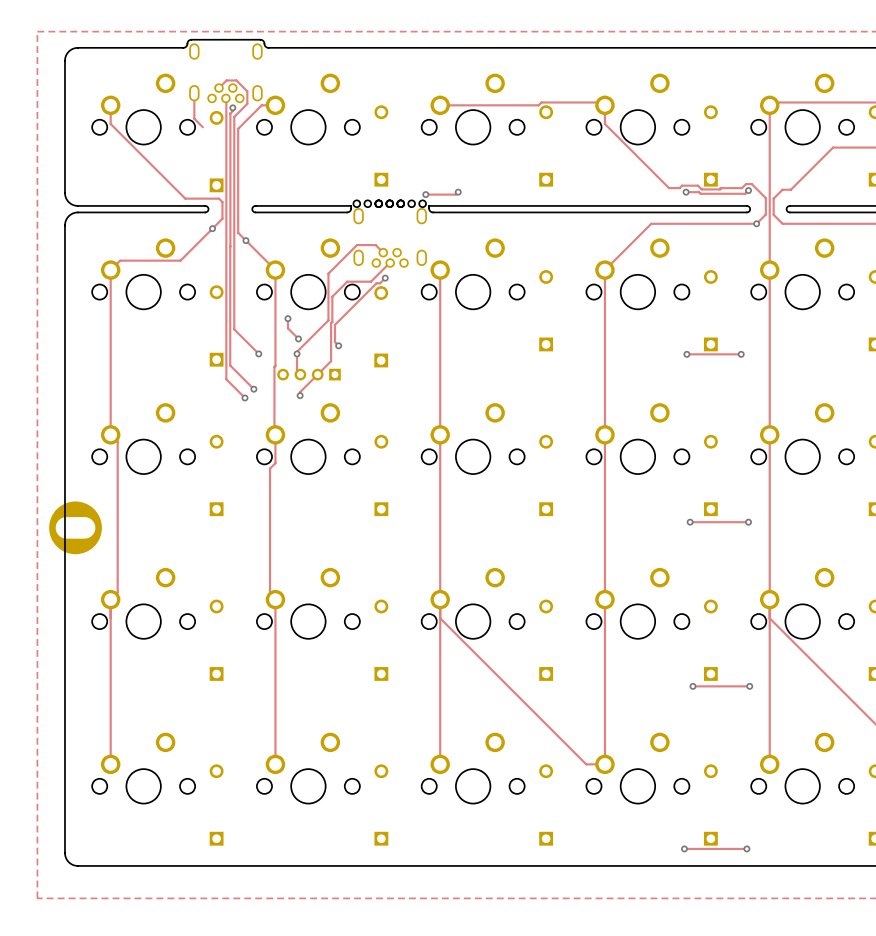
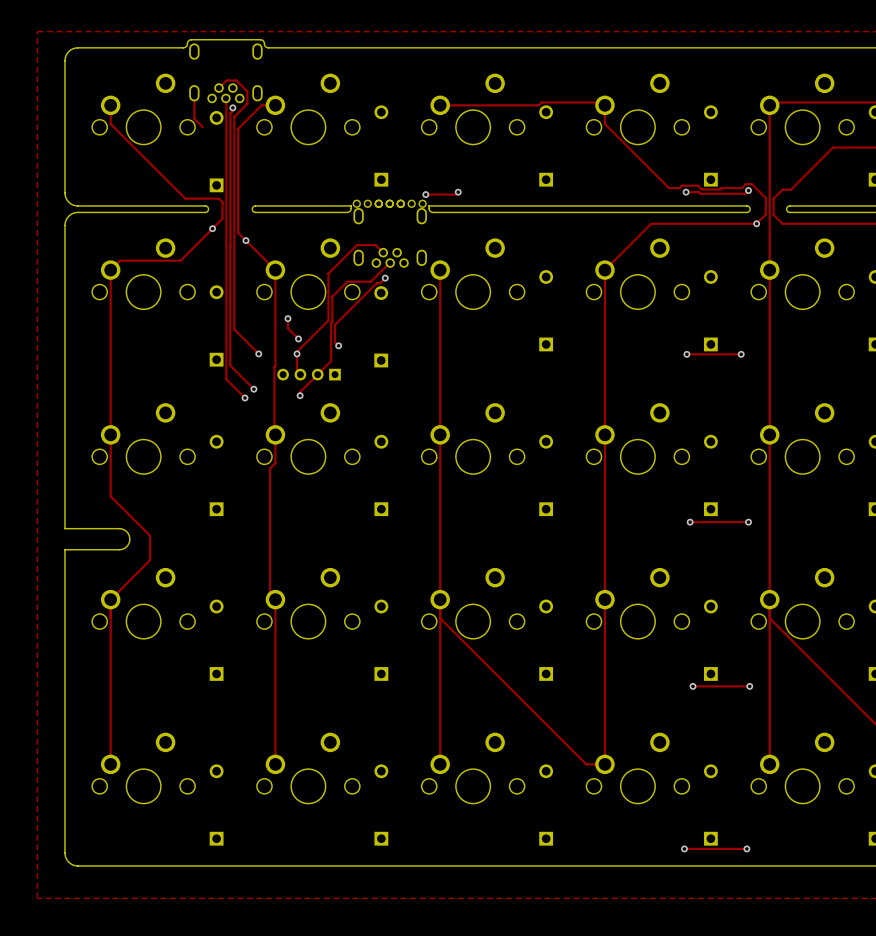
track: (117, 441) (117, 592) -> (110, 434) (110, 496) (150, 535) (150, 560) (117, 592)
part: (75, 527) -> none
board edge: (64, 528) (64, 549) -> (64, 528) (120, 528) (127, 532) (129, 539) (127, 545) (120, 549) (64, 549)

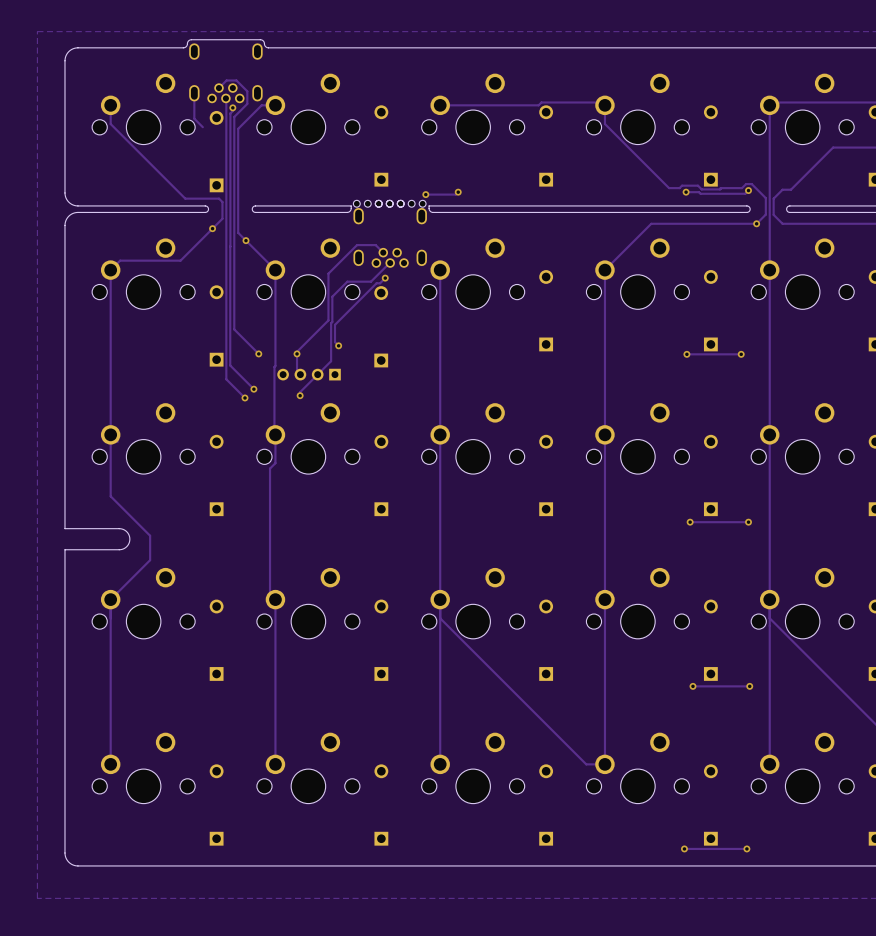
track: (287, 318) (287, 328) (298, 338) -> none
via: (287, 318) -> none
via: (298, 338) -> none

